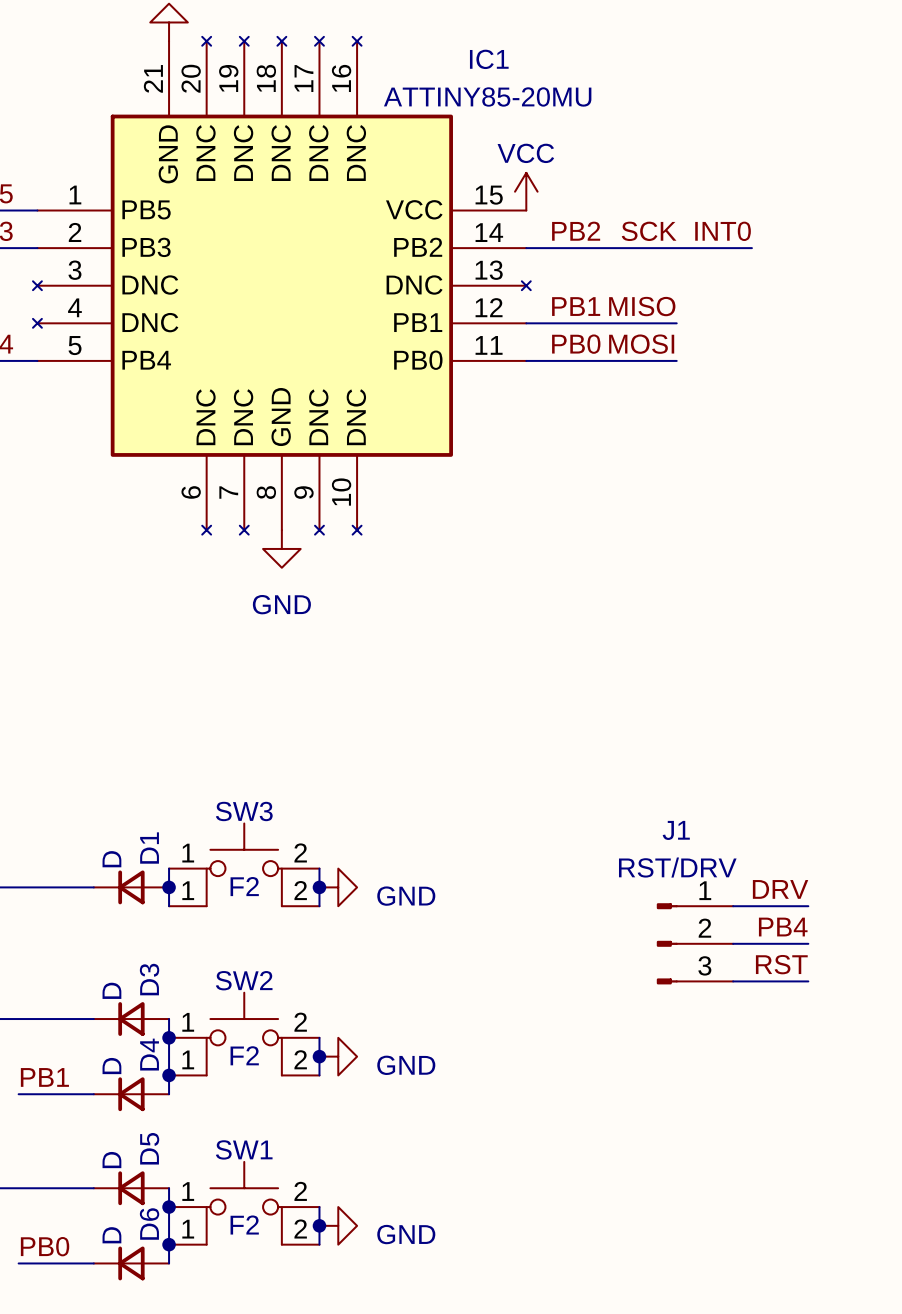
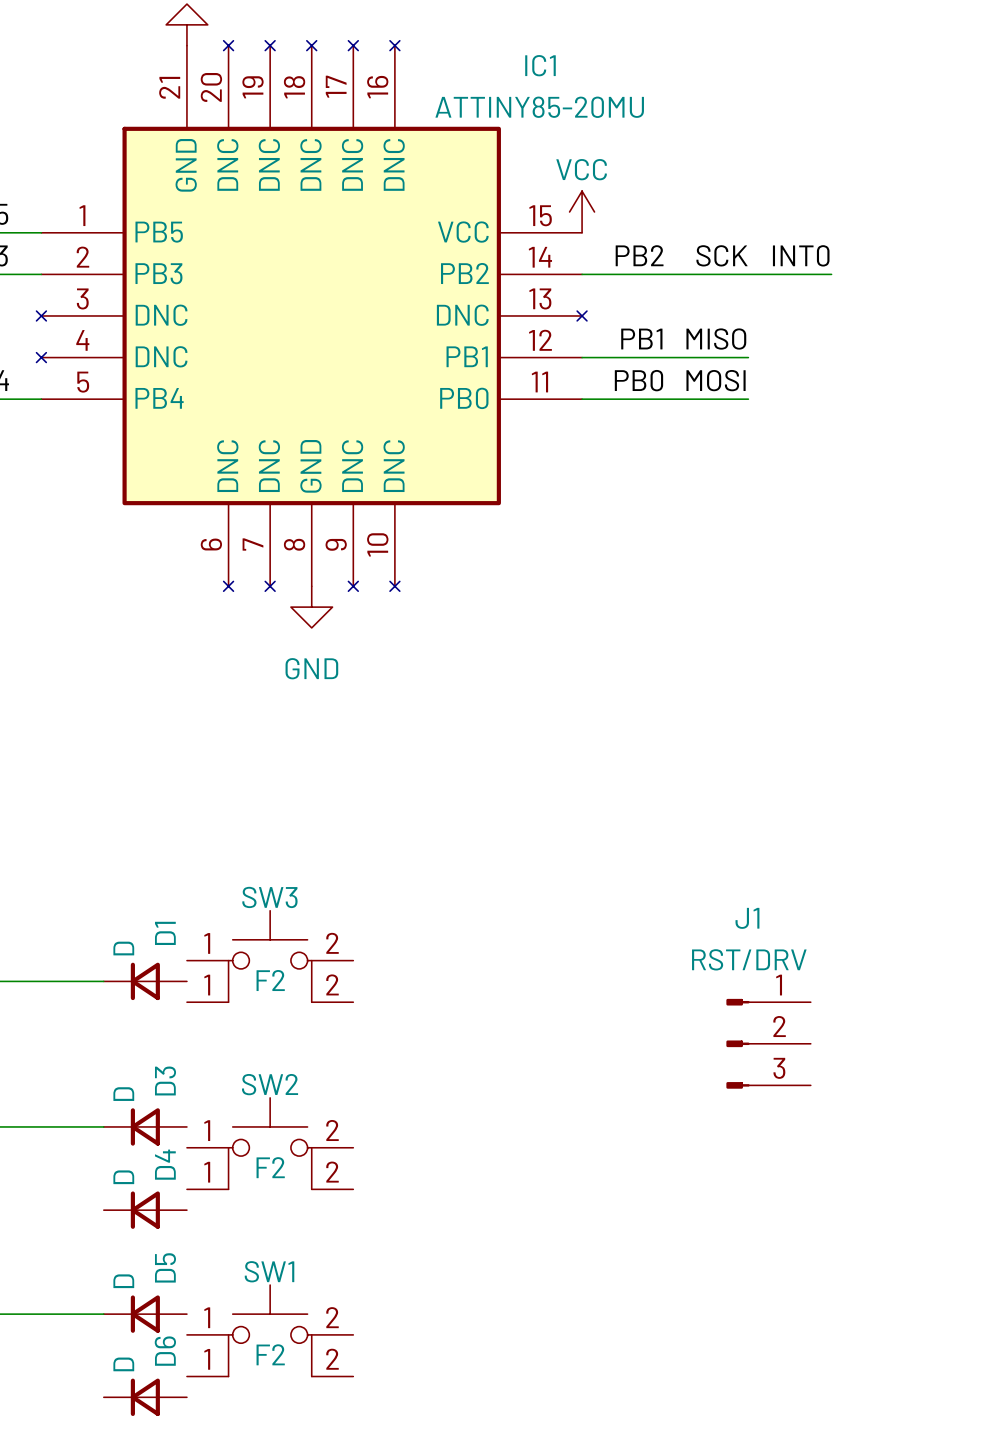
wire: (169, 868) (169, 906) -> none
wire: (319, 868) (319, 906) -> none
junction: (169, 887) -> none
junction: (319, 887) -> none
power symbol: GND (338, 887) -> none
label: DRV (780, 889) -> none
wire: (733, 906) (808, 906) -> none
label: PB4 (783, 927) -> none
wire: (733, 943) (808, 943) -> none
label: RST (781, 964) -> none
wire: (733, 981) (808, 981) -> none
wire: (169, 1019) (169, 1094) -> none
junction: (169, 1037) -> none
wire: (319, 1037) (319, 1075) -> none
junction: (319, 1056) -> none
power symbol: GND (338, 1056) -> none
junction: (169, 1075) -> none
label: PB1 (44, 1077) -> none
wire: (18, 1094) (93, 1094) -> none
wire: (169, 1188) (169, 1263) -> none
junction: (169, 1207) -> none
wire: (319, 1207) (319, 1244) -> none
junction: (319, 1225) -> none
power symbol: GND (338, 1225) -> none
junction: (169, 1244) -> none
label: PB0 (45, 1246) -> none
wire: (18, 1263) (93, 1263) -> none

